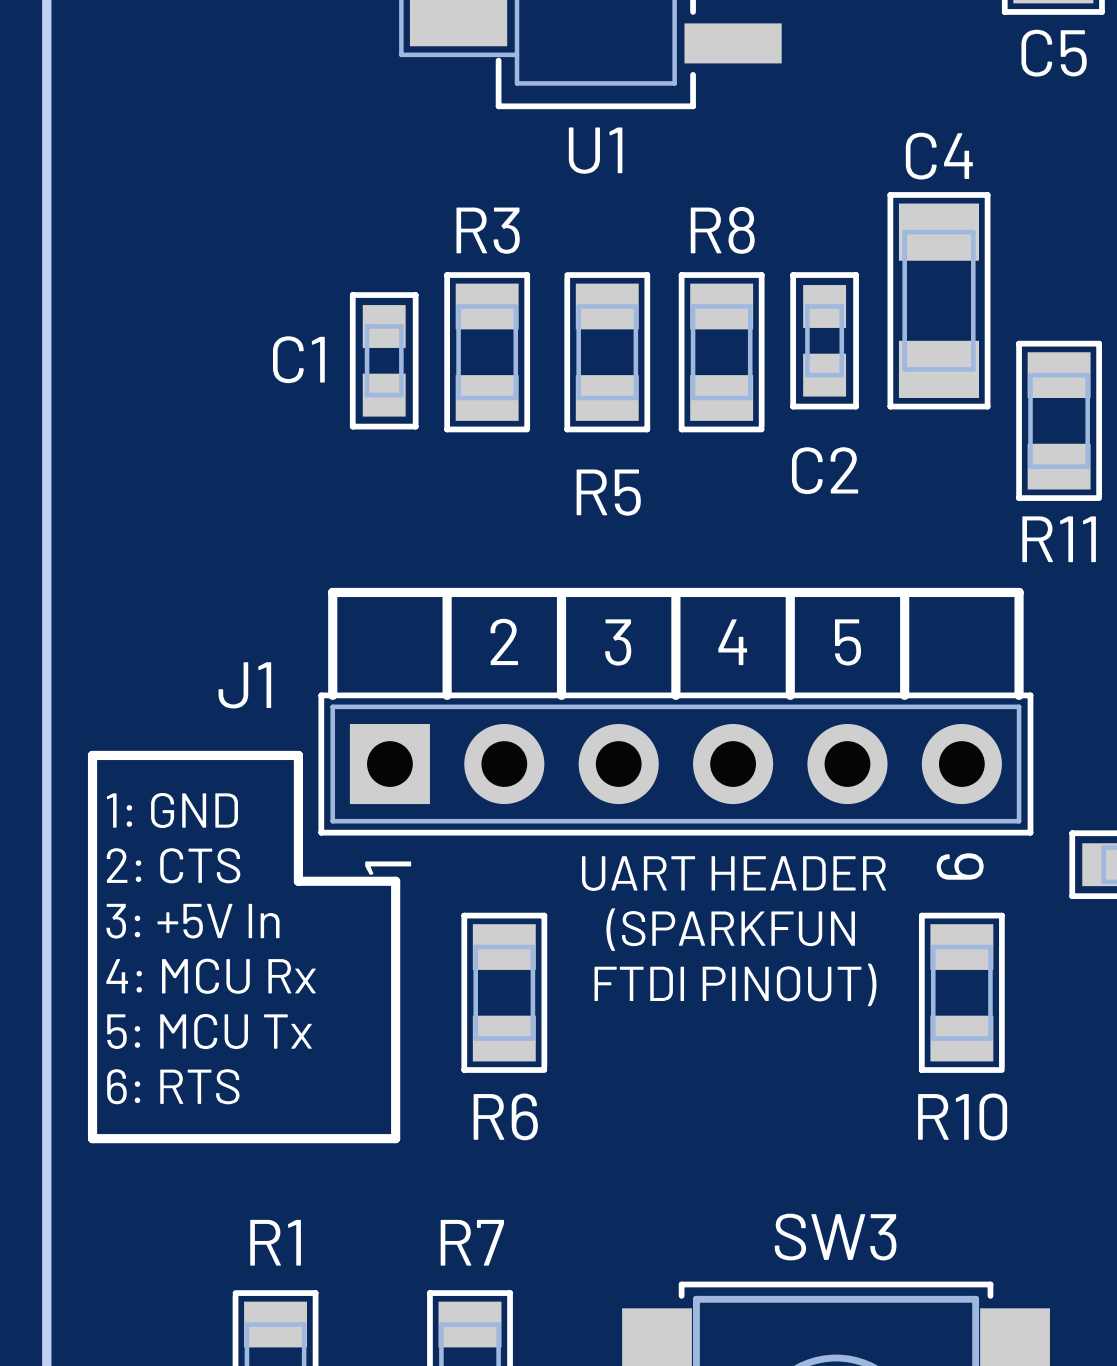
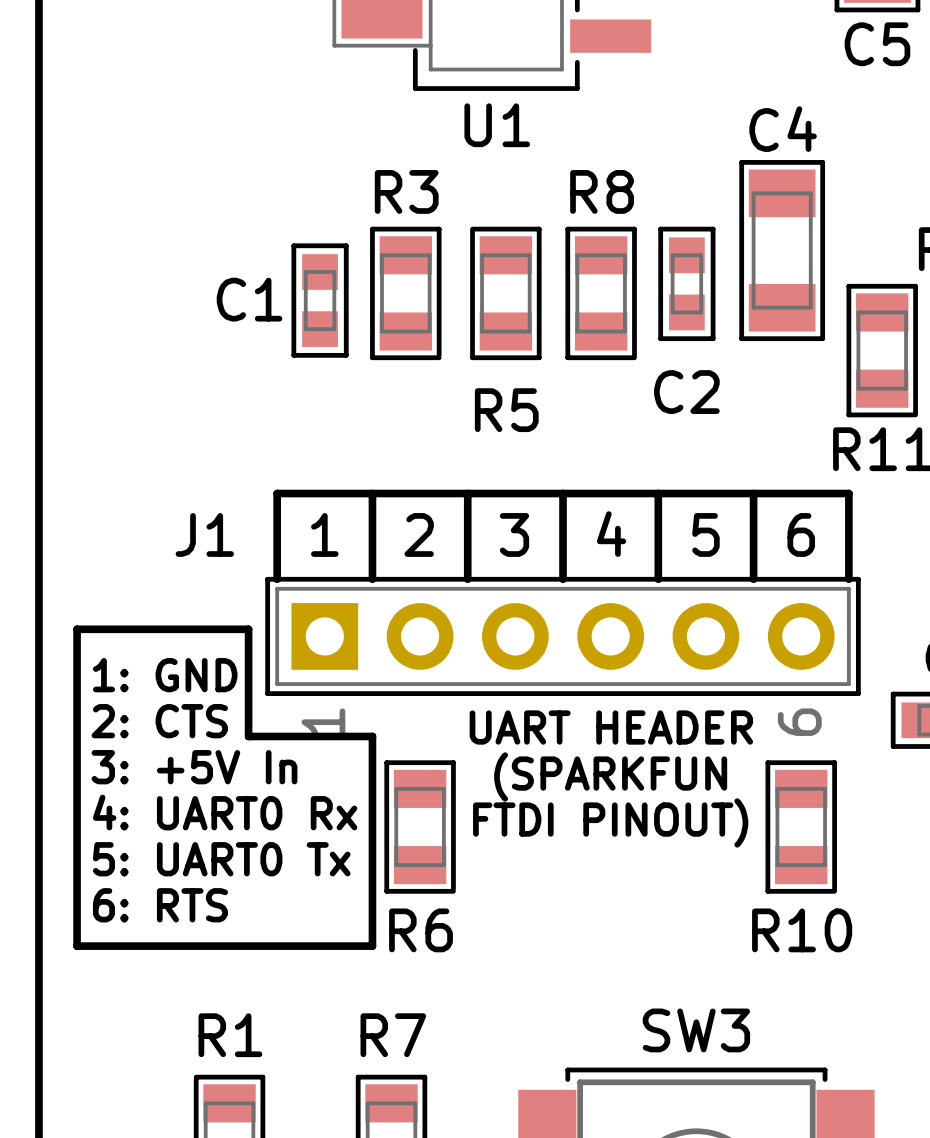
J1 footprint: [318, 692, 1034, 836] -> [265, 576, 861, 696]
line: (298, 881) (395, 881) (395, 1138) (92, 1138) (92, 1135) -> (248, 734) (248, 736) (372, 736) (372, 946) (77, 946)
text: 4: MCU Rx (211, 976) -> 4: UART0 Rx (225, 812)
text: 5: MCU Tx (209, 1031) -> 5: UART0 Tx (221, 859)

